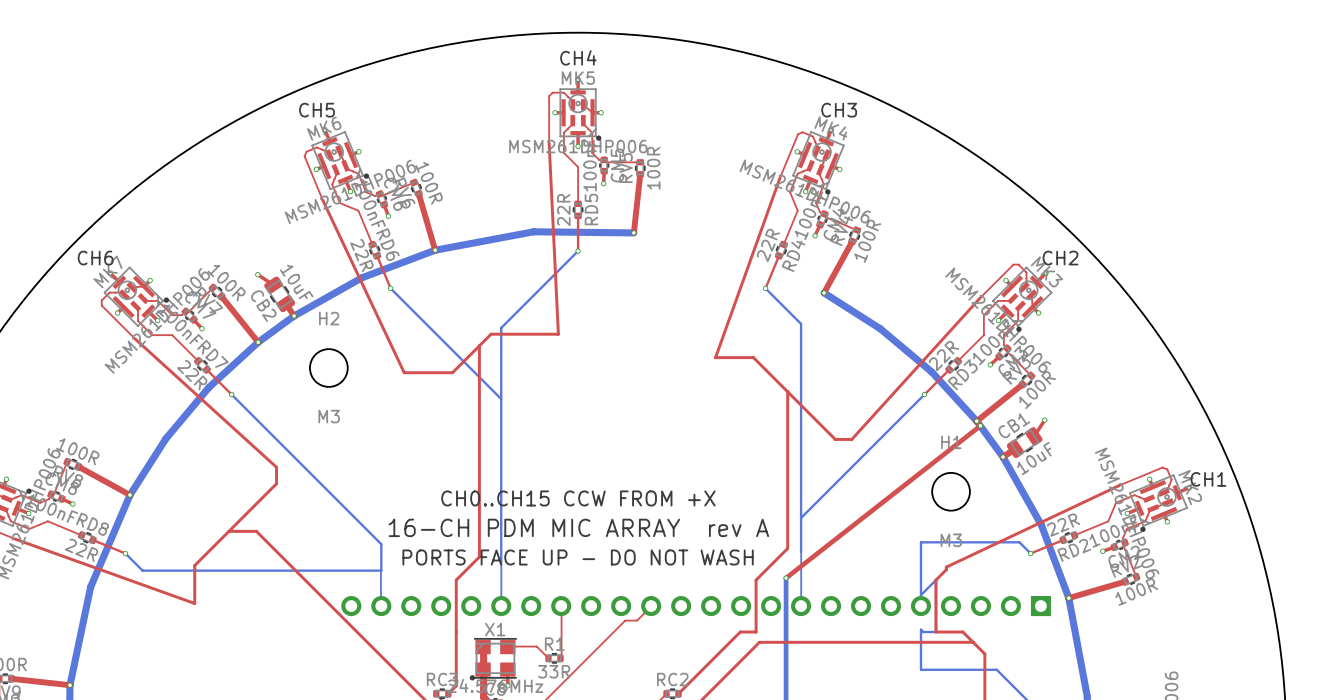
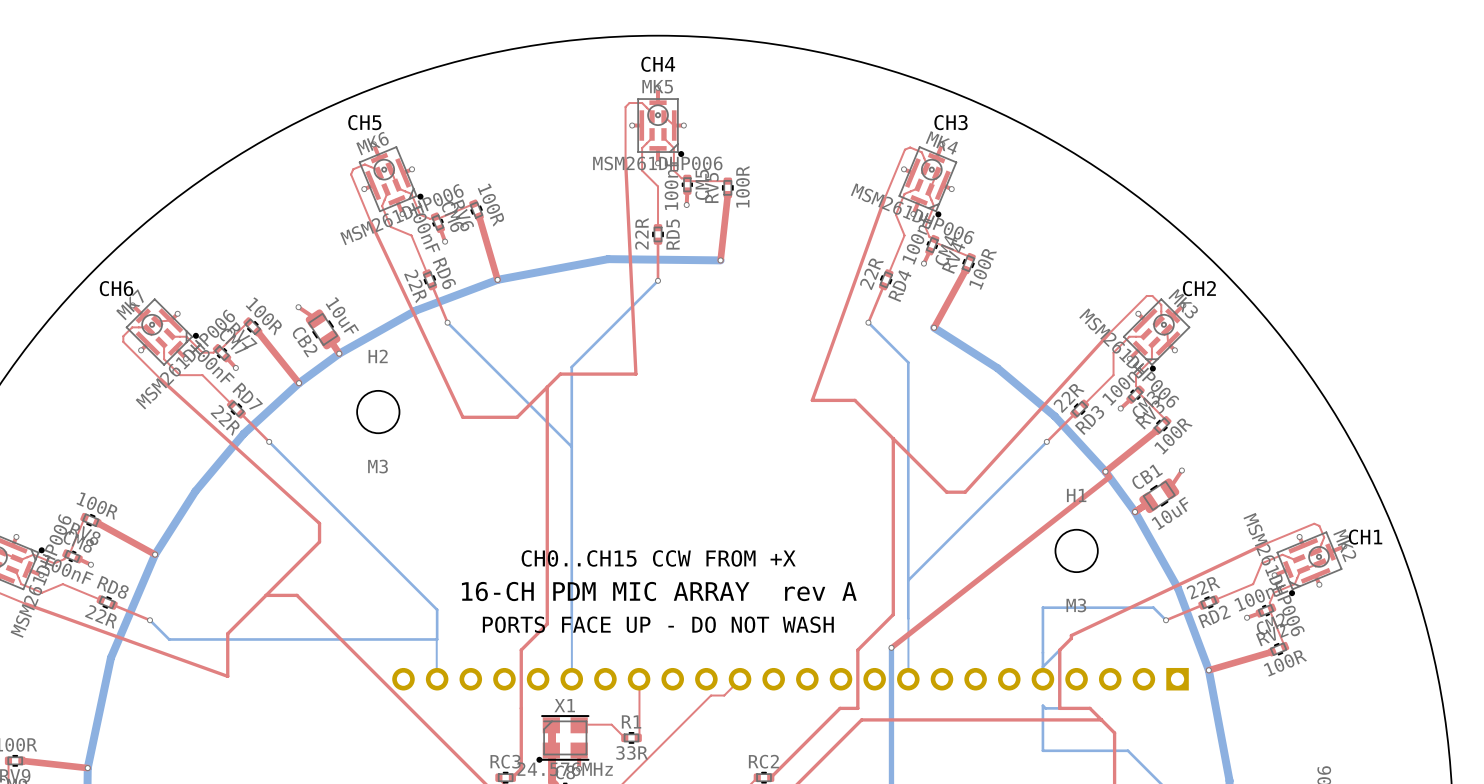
via: (980, 425) -> none

